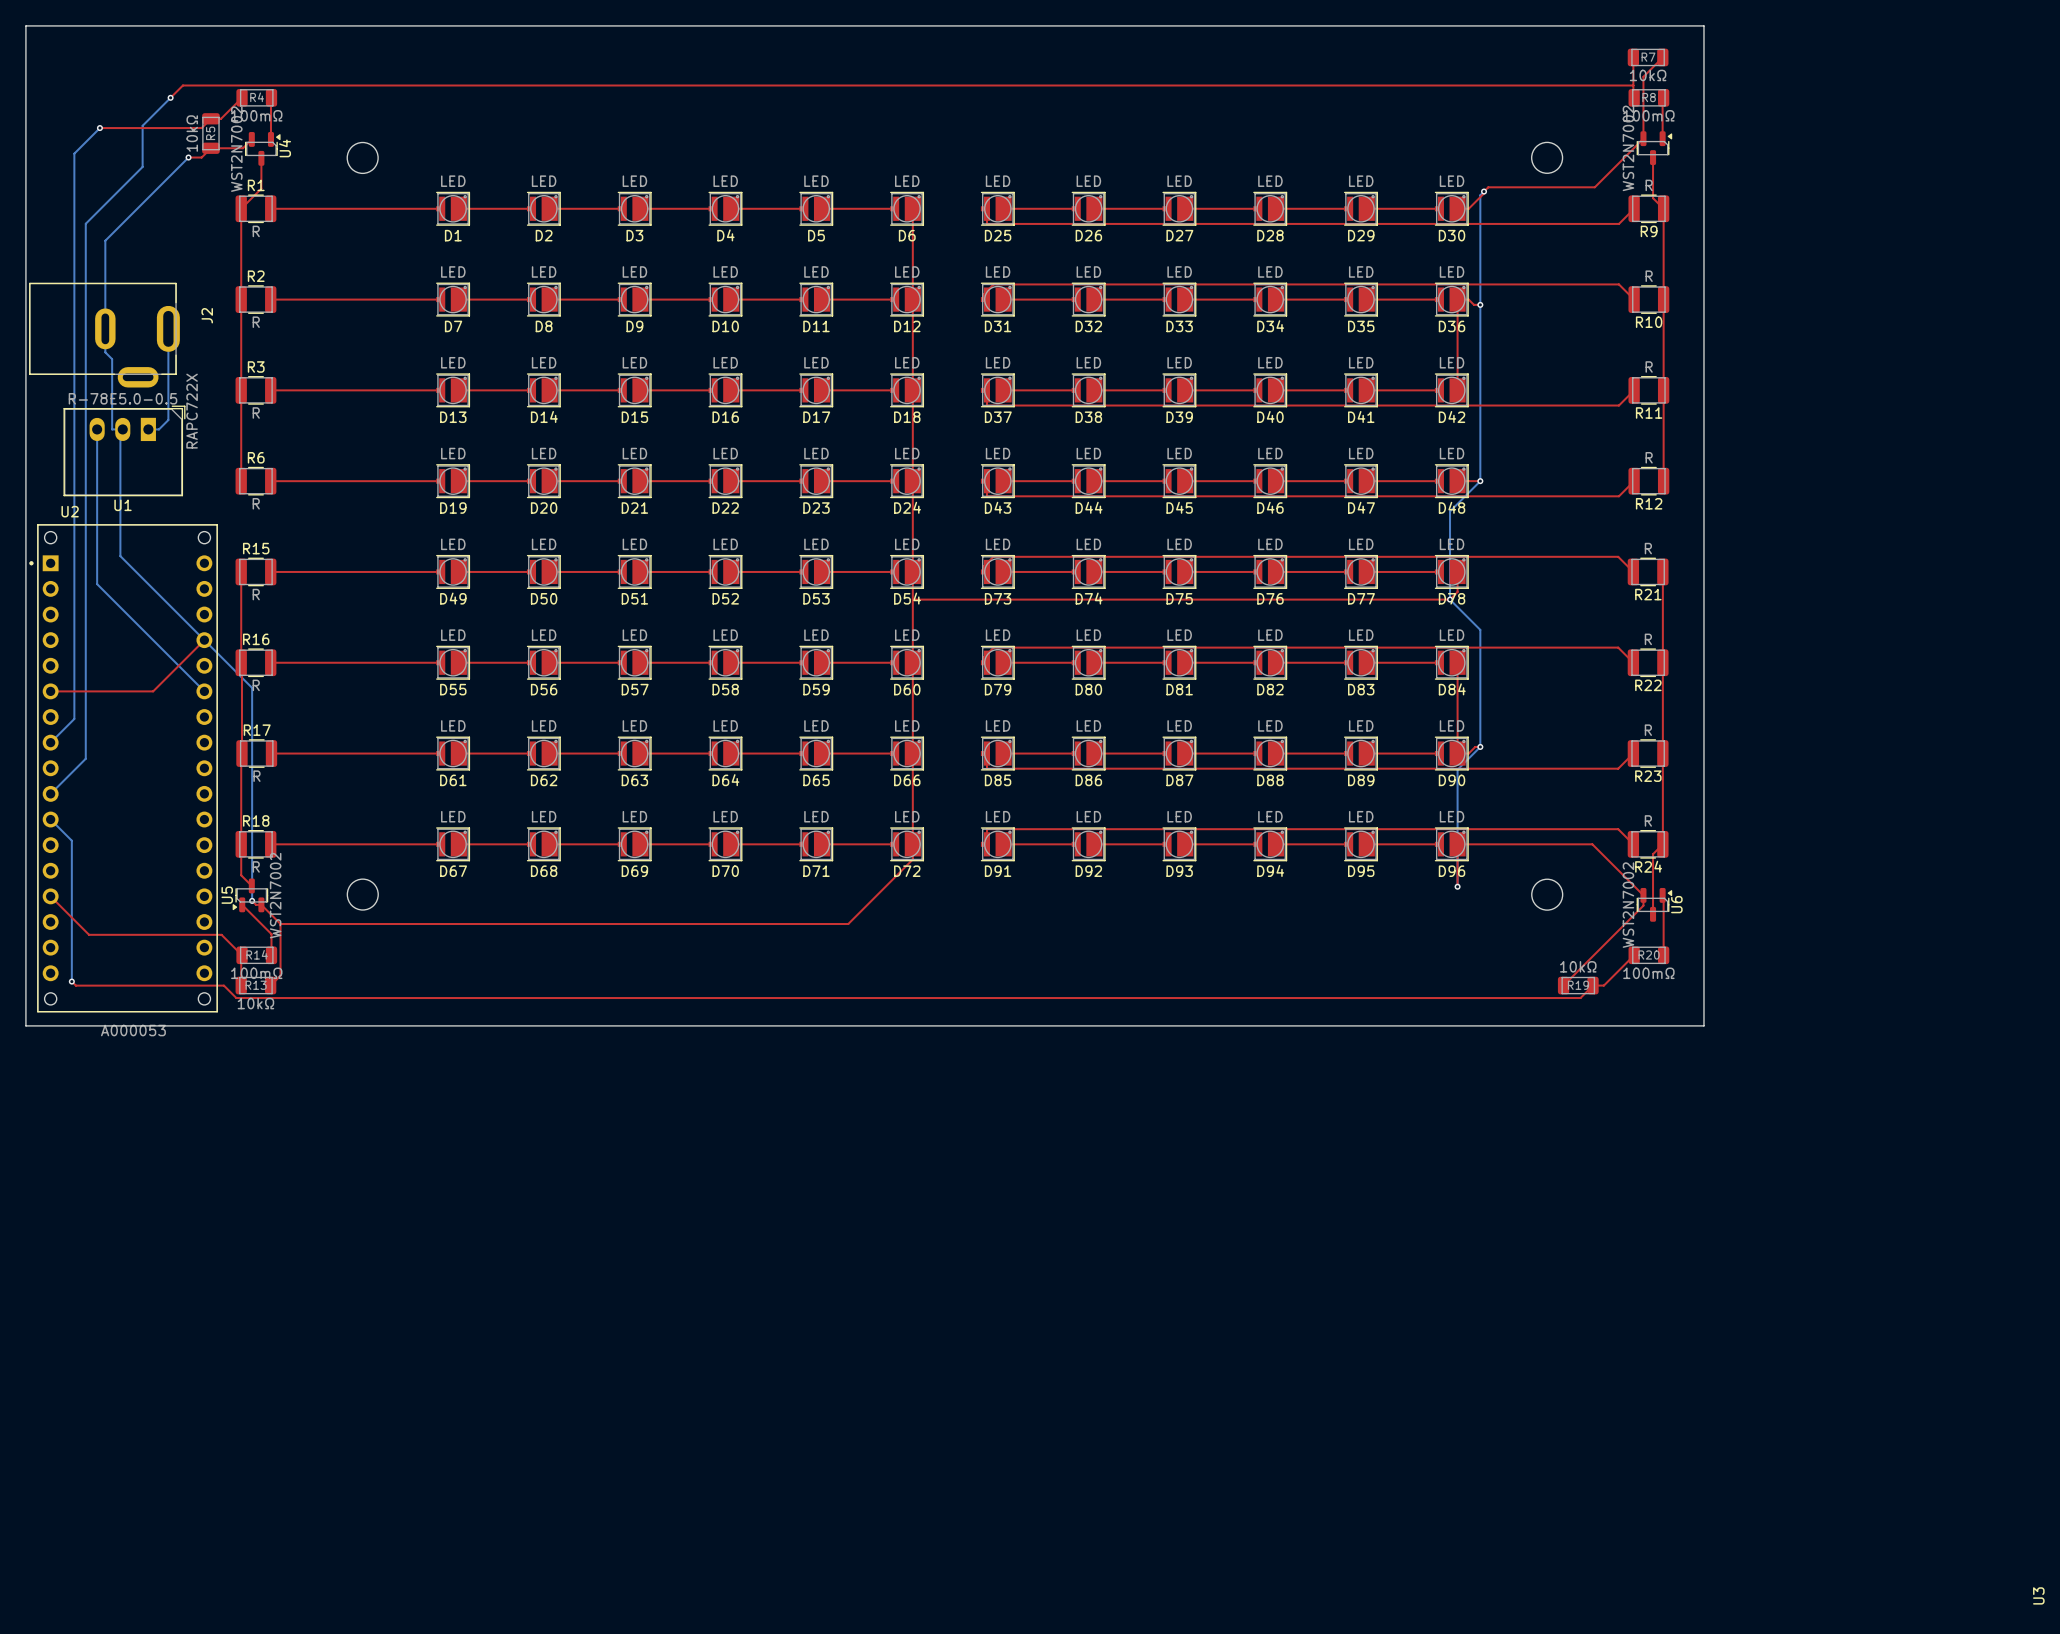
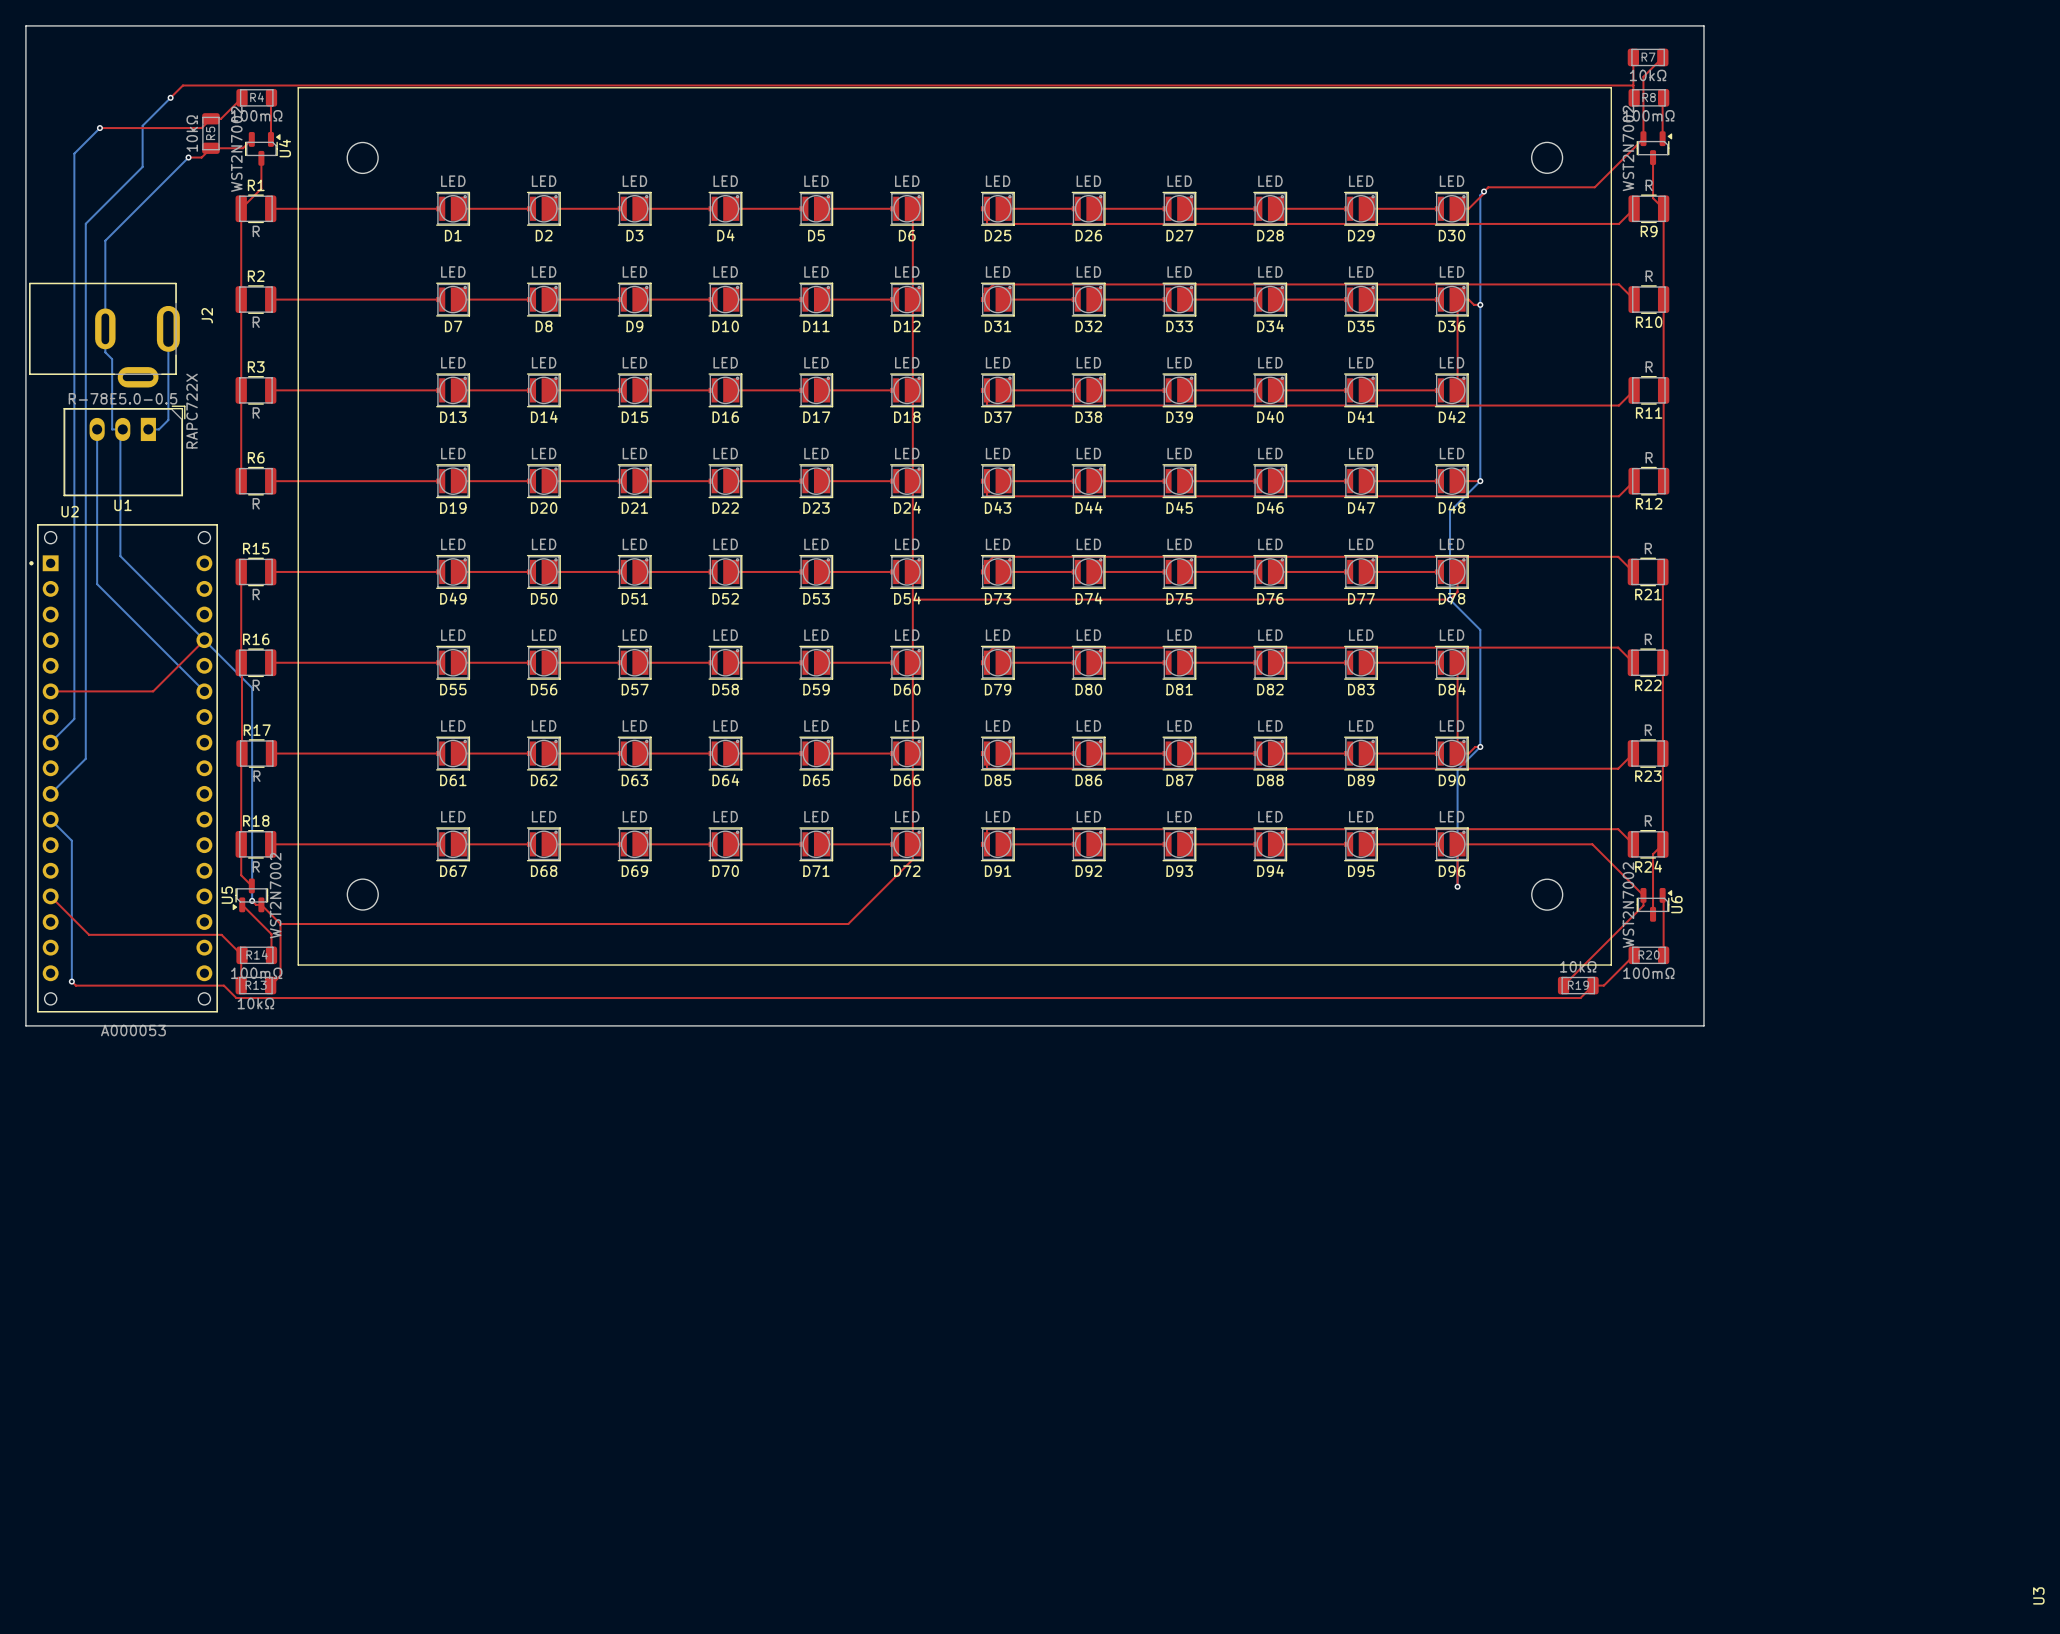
line: none -> (298, 87) (1611, 87) (1611, 965) (298, 965) (298, 87)

